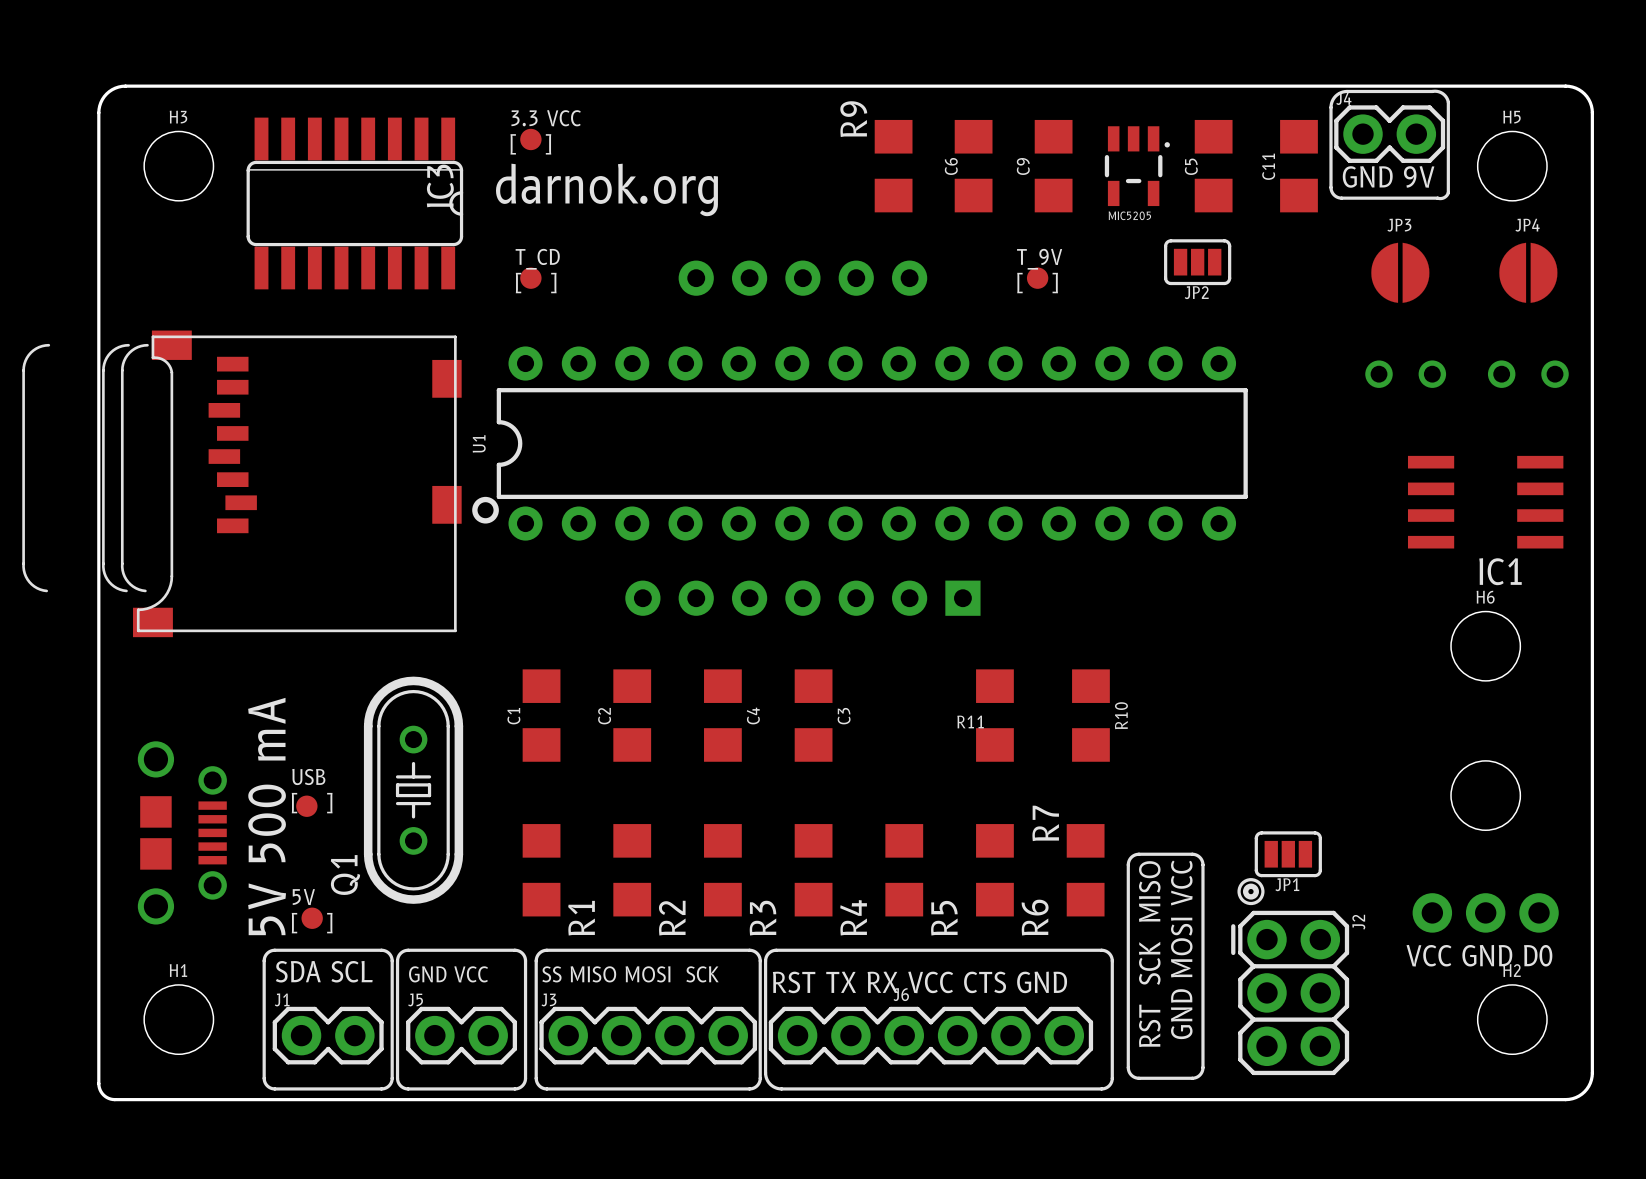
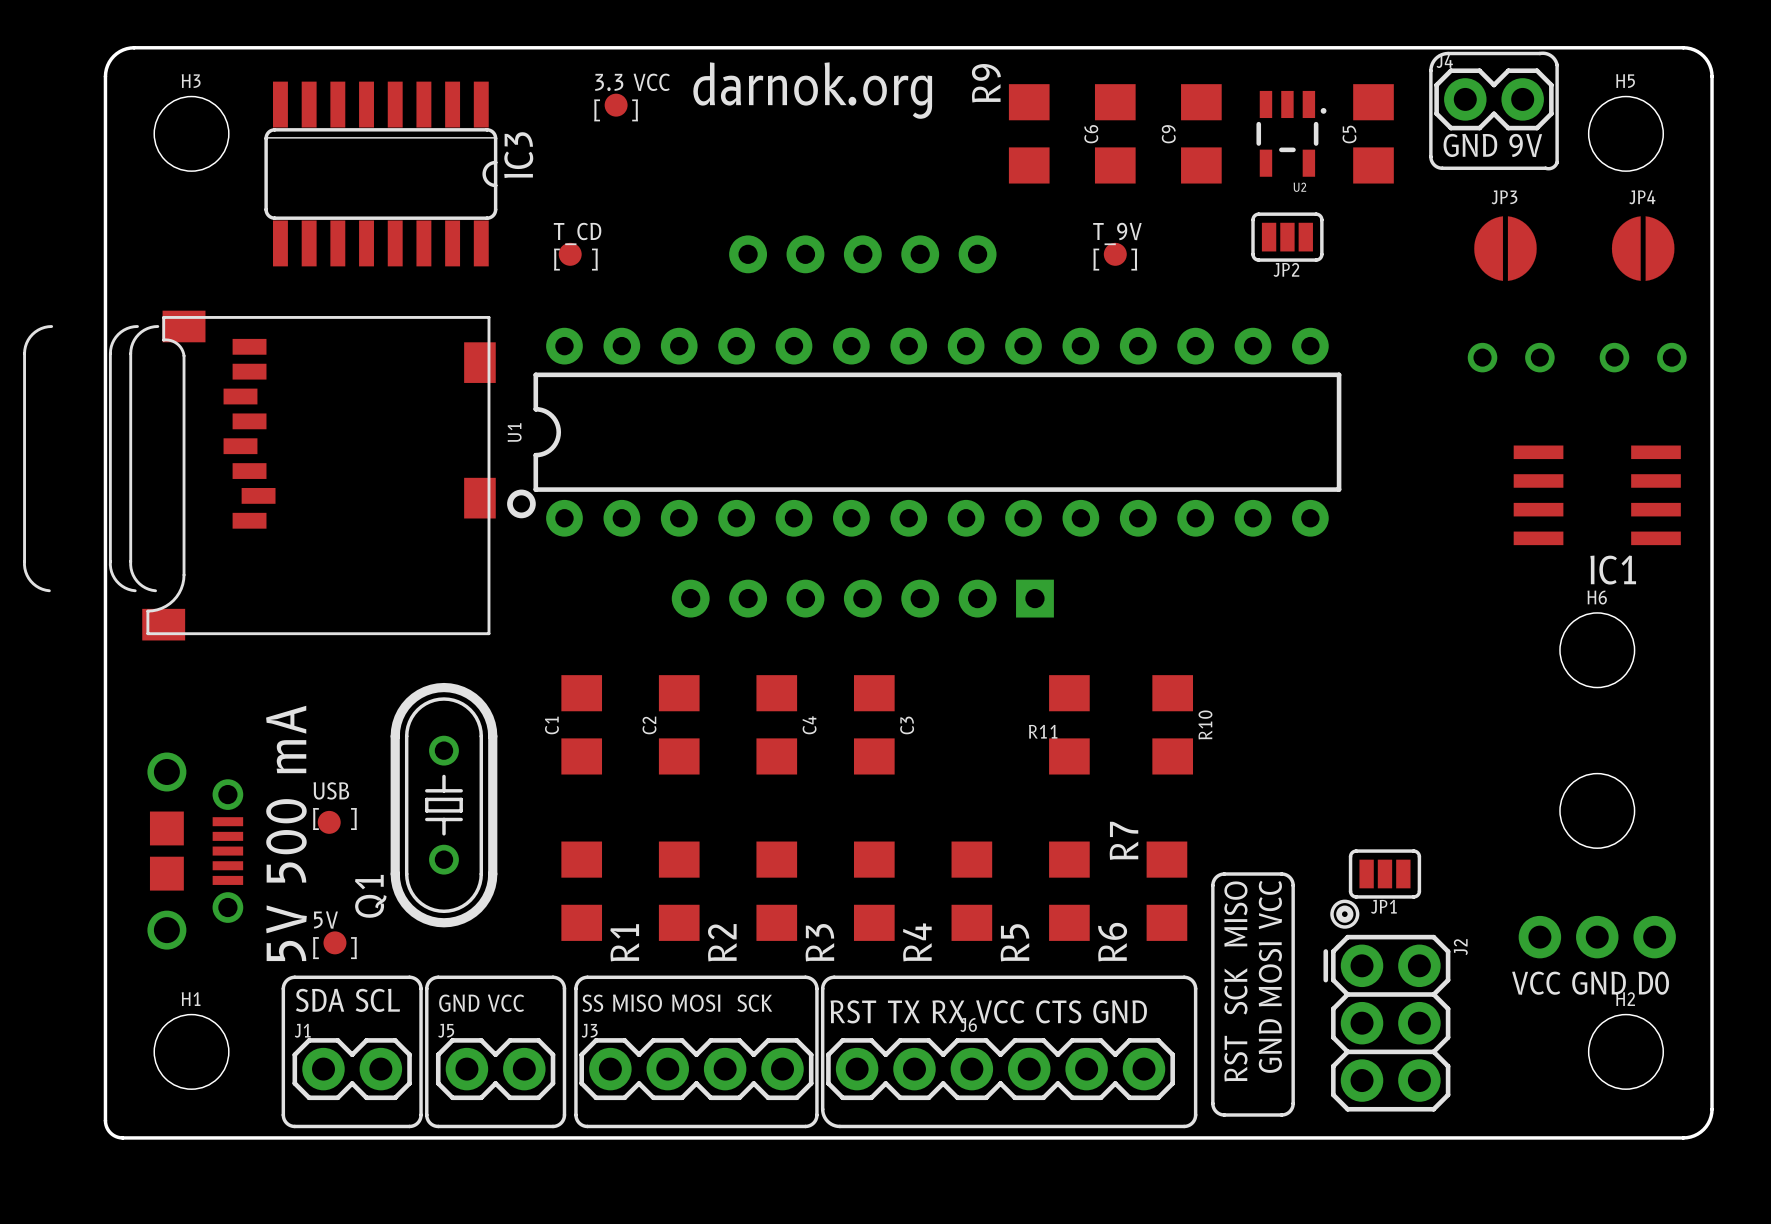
text position: 3.3 VCC (546, 118) -> 3.3 VCC (632, 82)
part position: (530, 139) -> (616, 105)
text position: [ ] (530, 144) -> [ ] (616, 110)
R9 position: (893, 166) -> (1029, 133)
C6 position: (973, 166) -> (1115, 133)
C9 position: (1053, 166) -> (1201, 133)
MIC5205: (1137, 166) -> none
U2: none -> (1291, 133)
C5 position: (1213, 166) -> (1373, 133)
C11: (1298, 166) -> none
IC3 name position: IC3 (440, 185) -> IC3 (518, 155)
text position: darnok.org (606, 189) -> darnok.org (812, 90)

